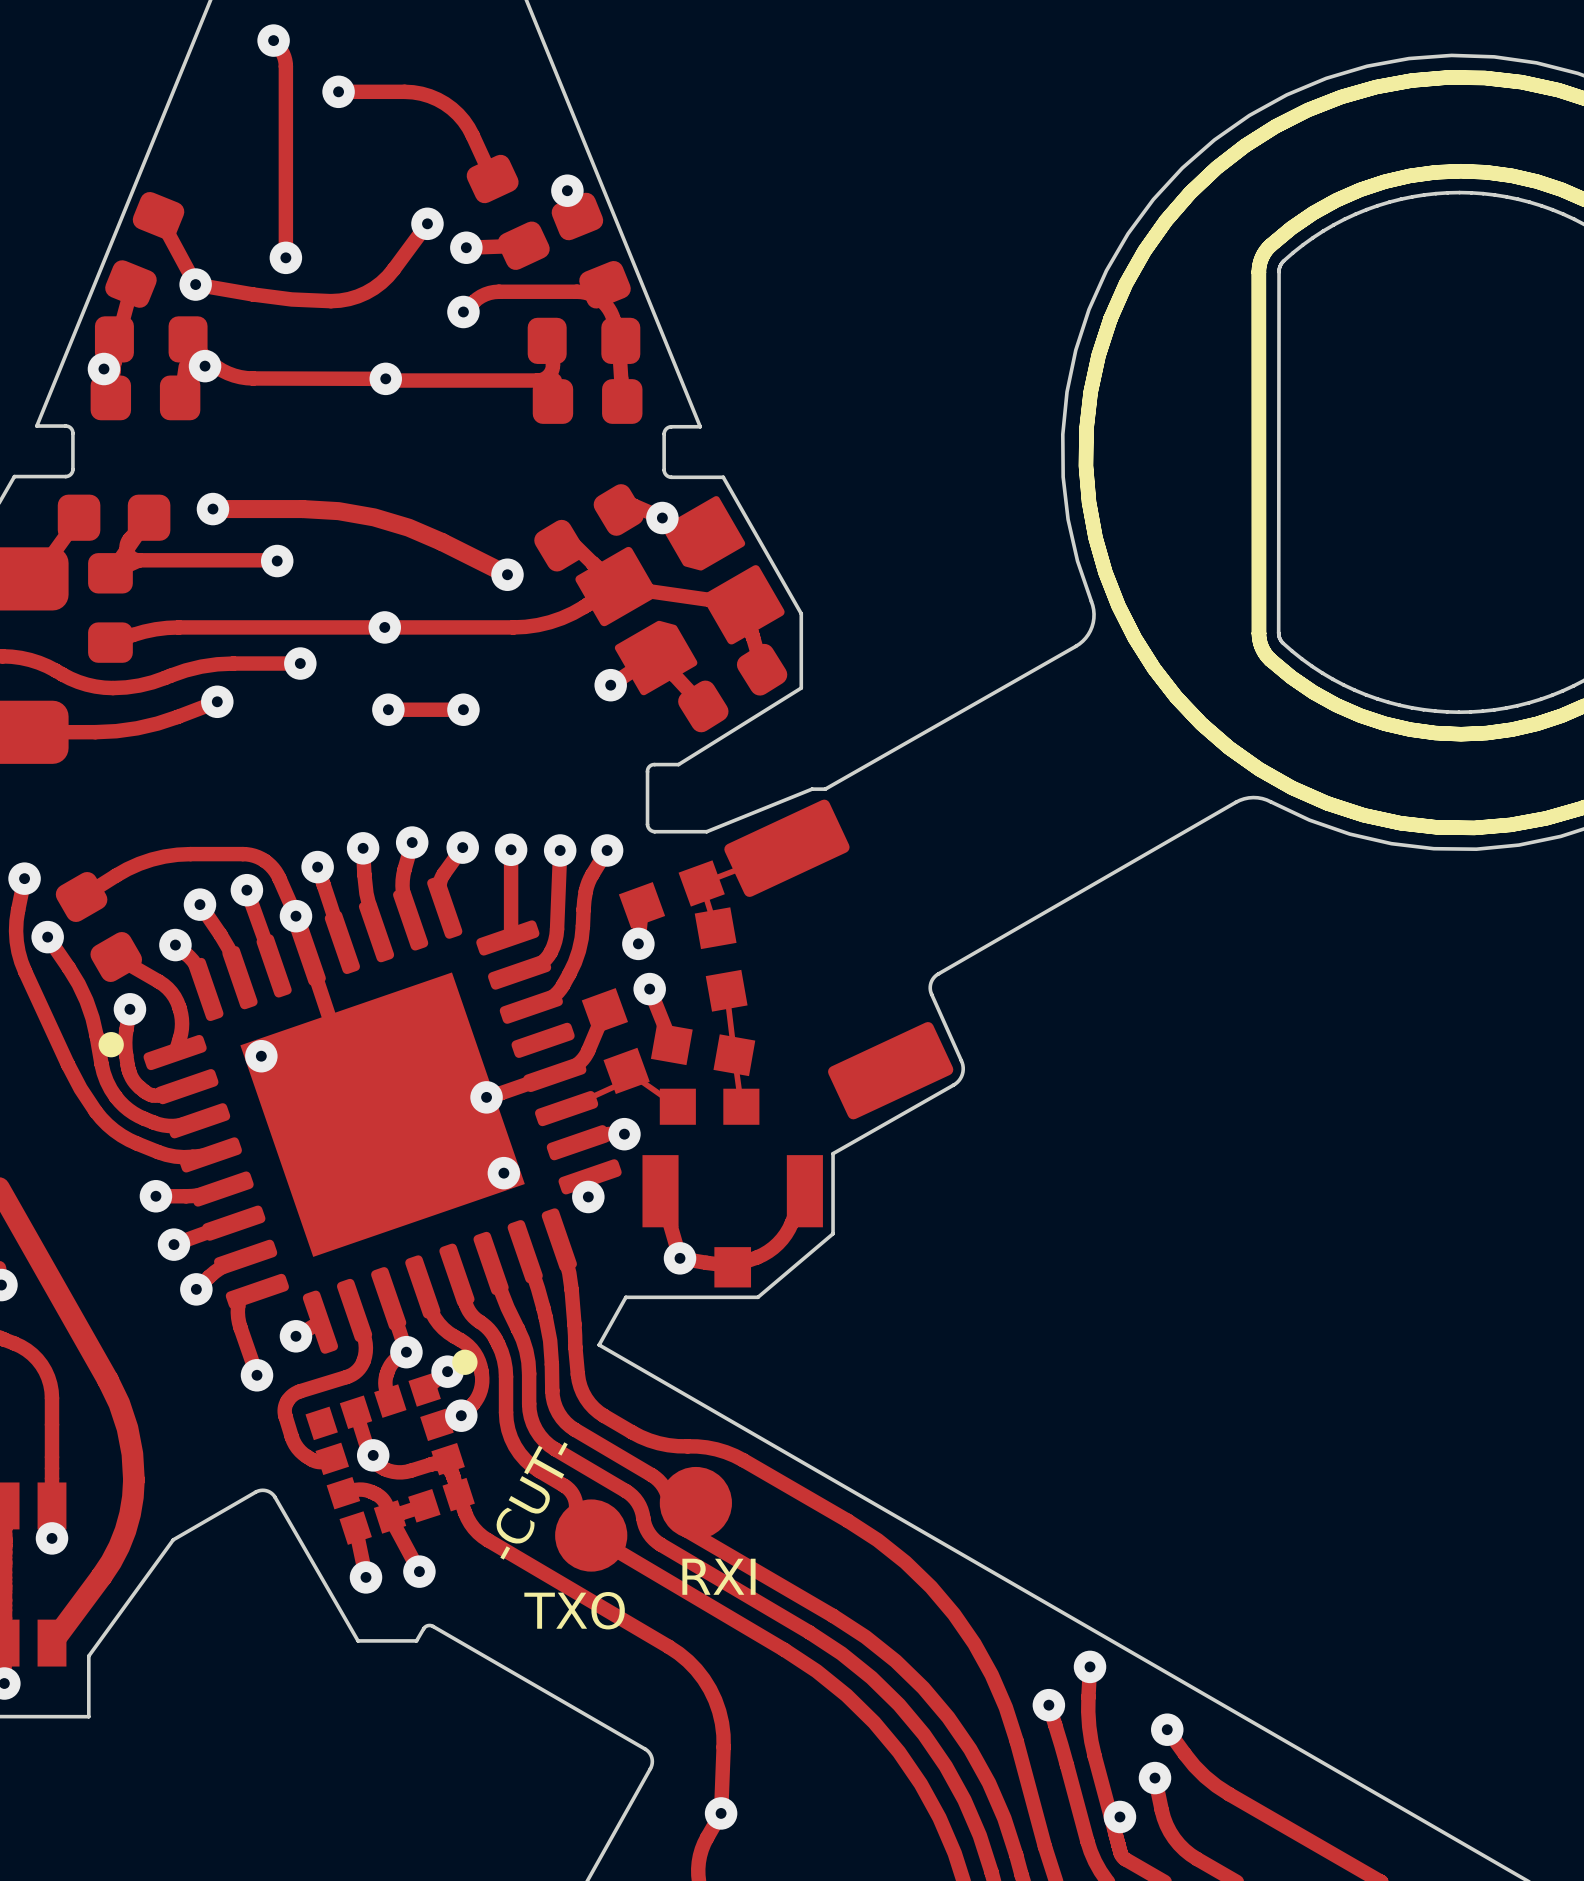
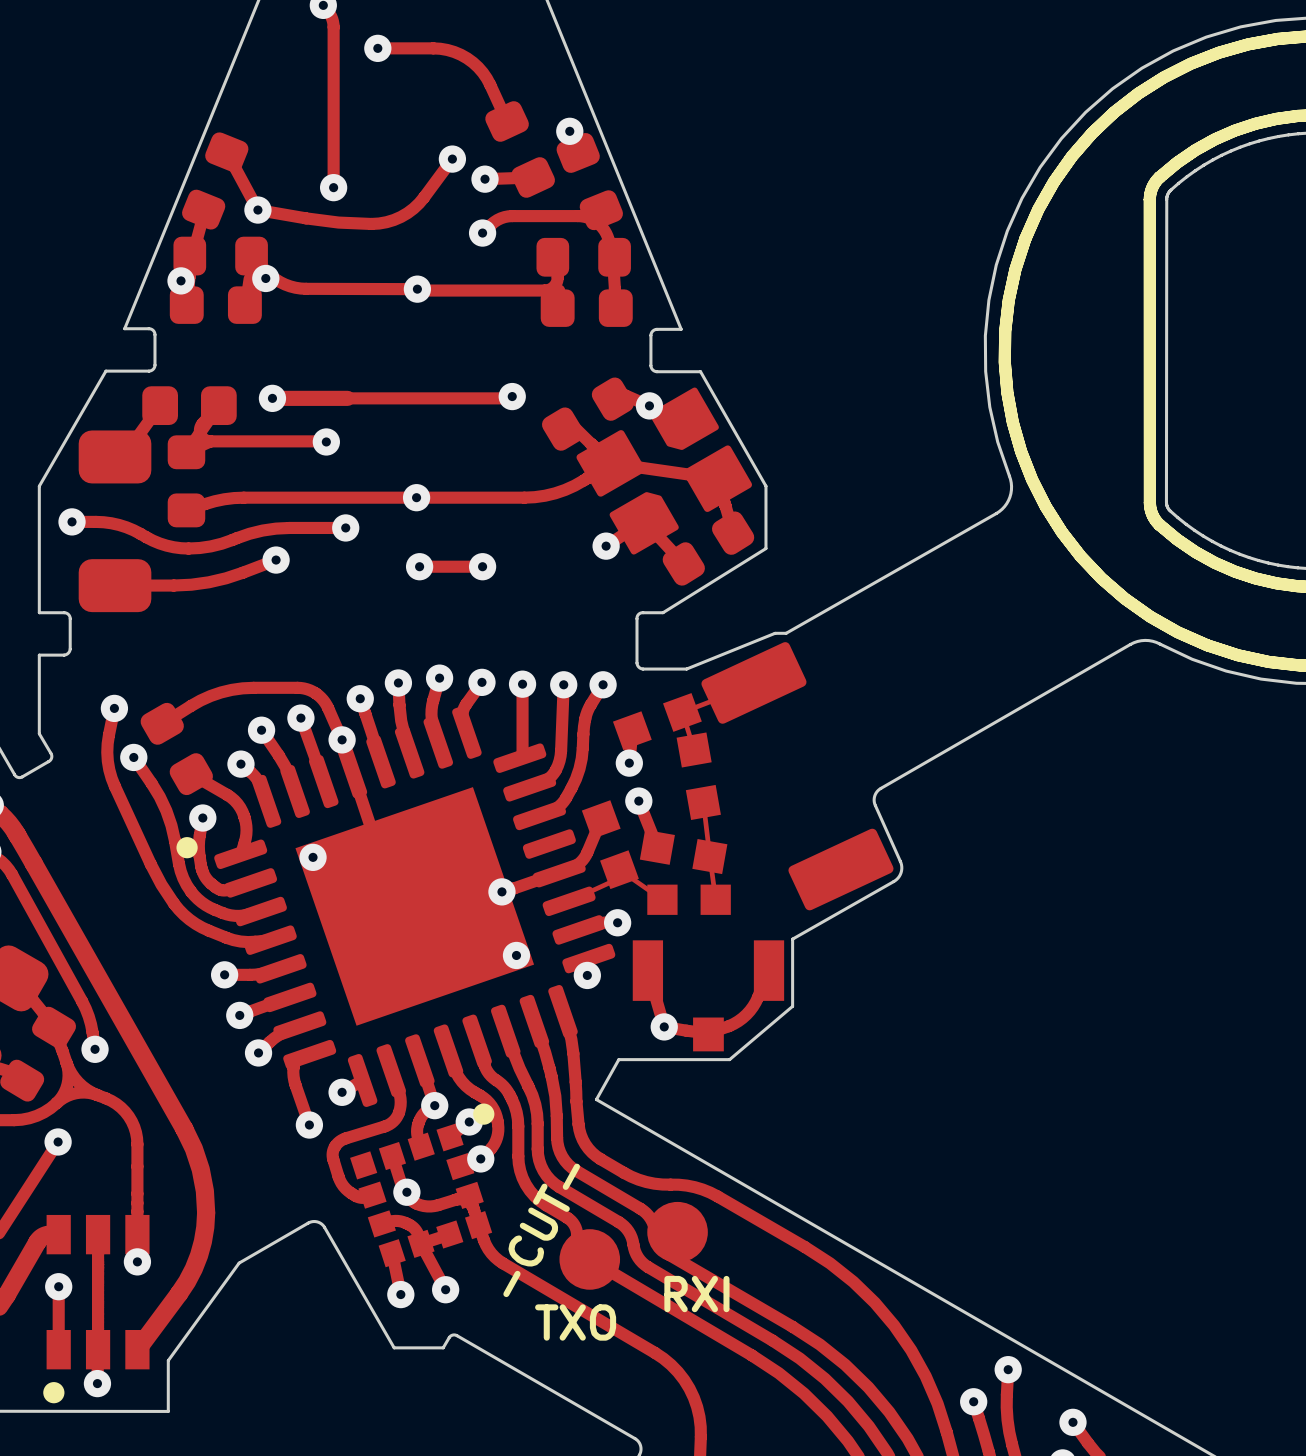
track: (302, 509) (338, 511) (374, 517) (408, 527) (507, 574) -> (347, 398) (512, 397)
via position: (507, 574) -> (512, 396)

